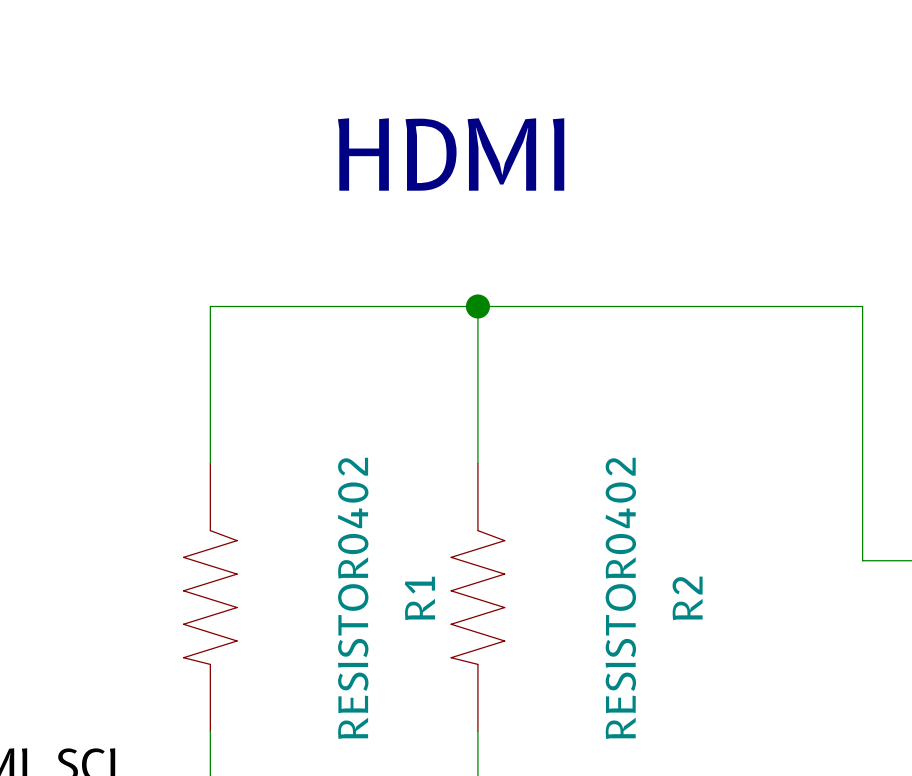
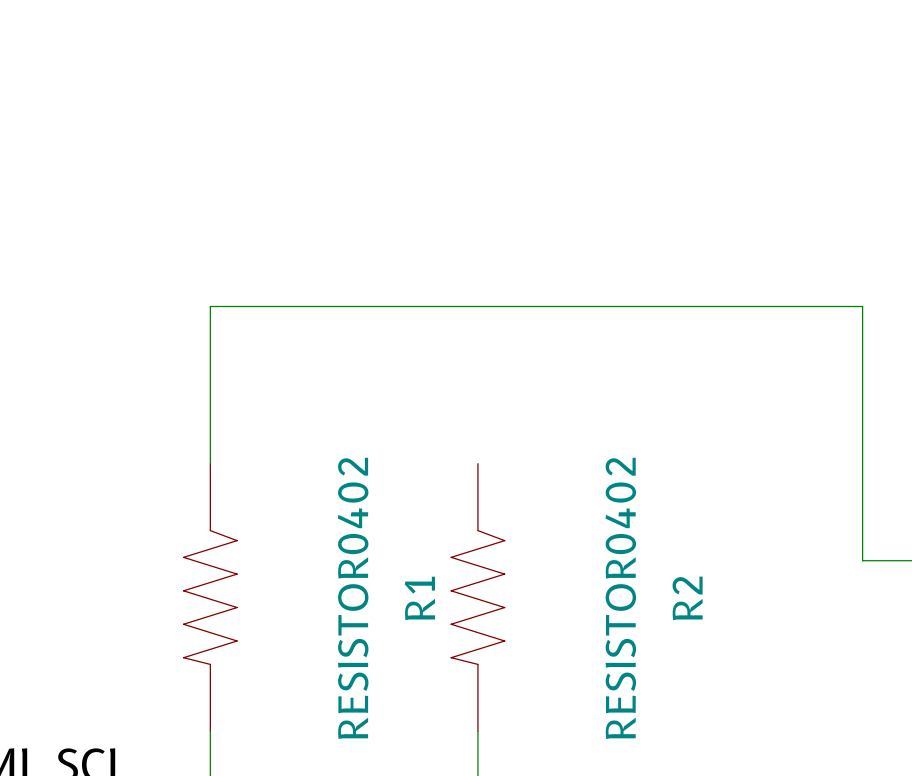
text: HDMI (451, 154) -> none
wire: (477, 306) (477, 463) -> none
junction: (477, 306) -> none

